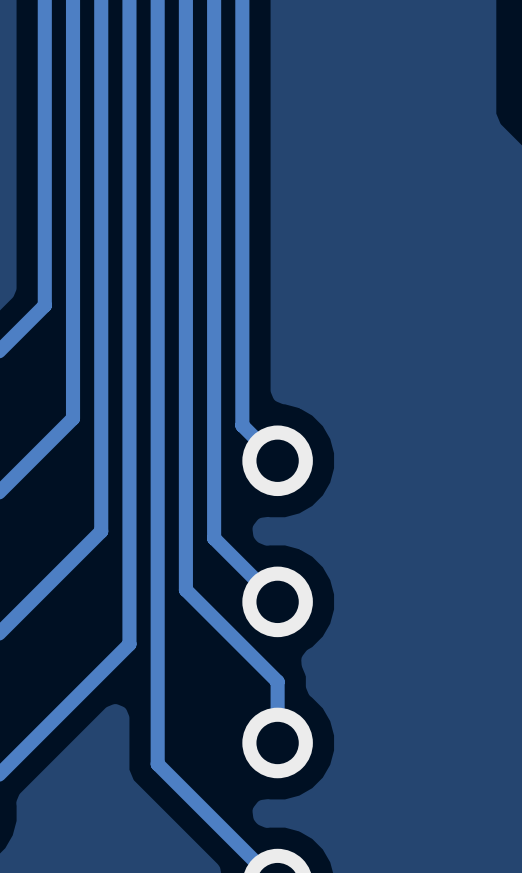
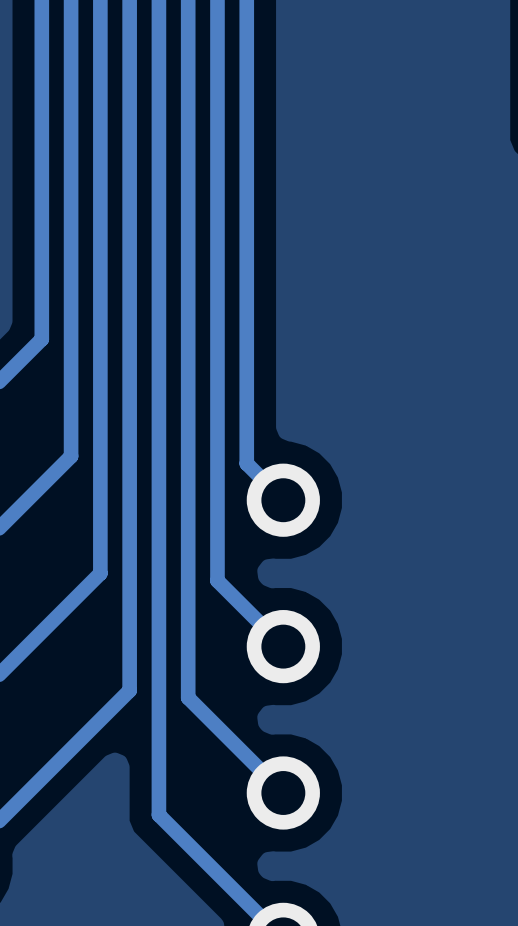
track: (185, 589) (277, 681) (277, 742) -> (188, 634) (188, 697) (283, 792)

